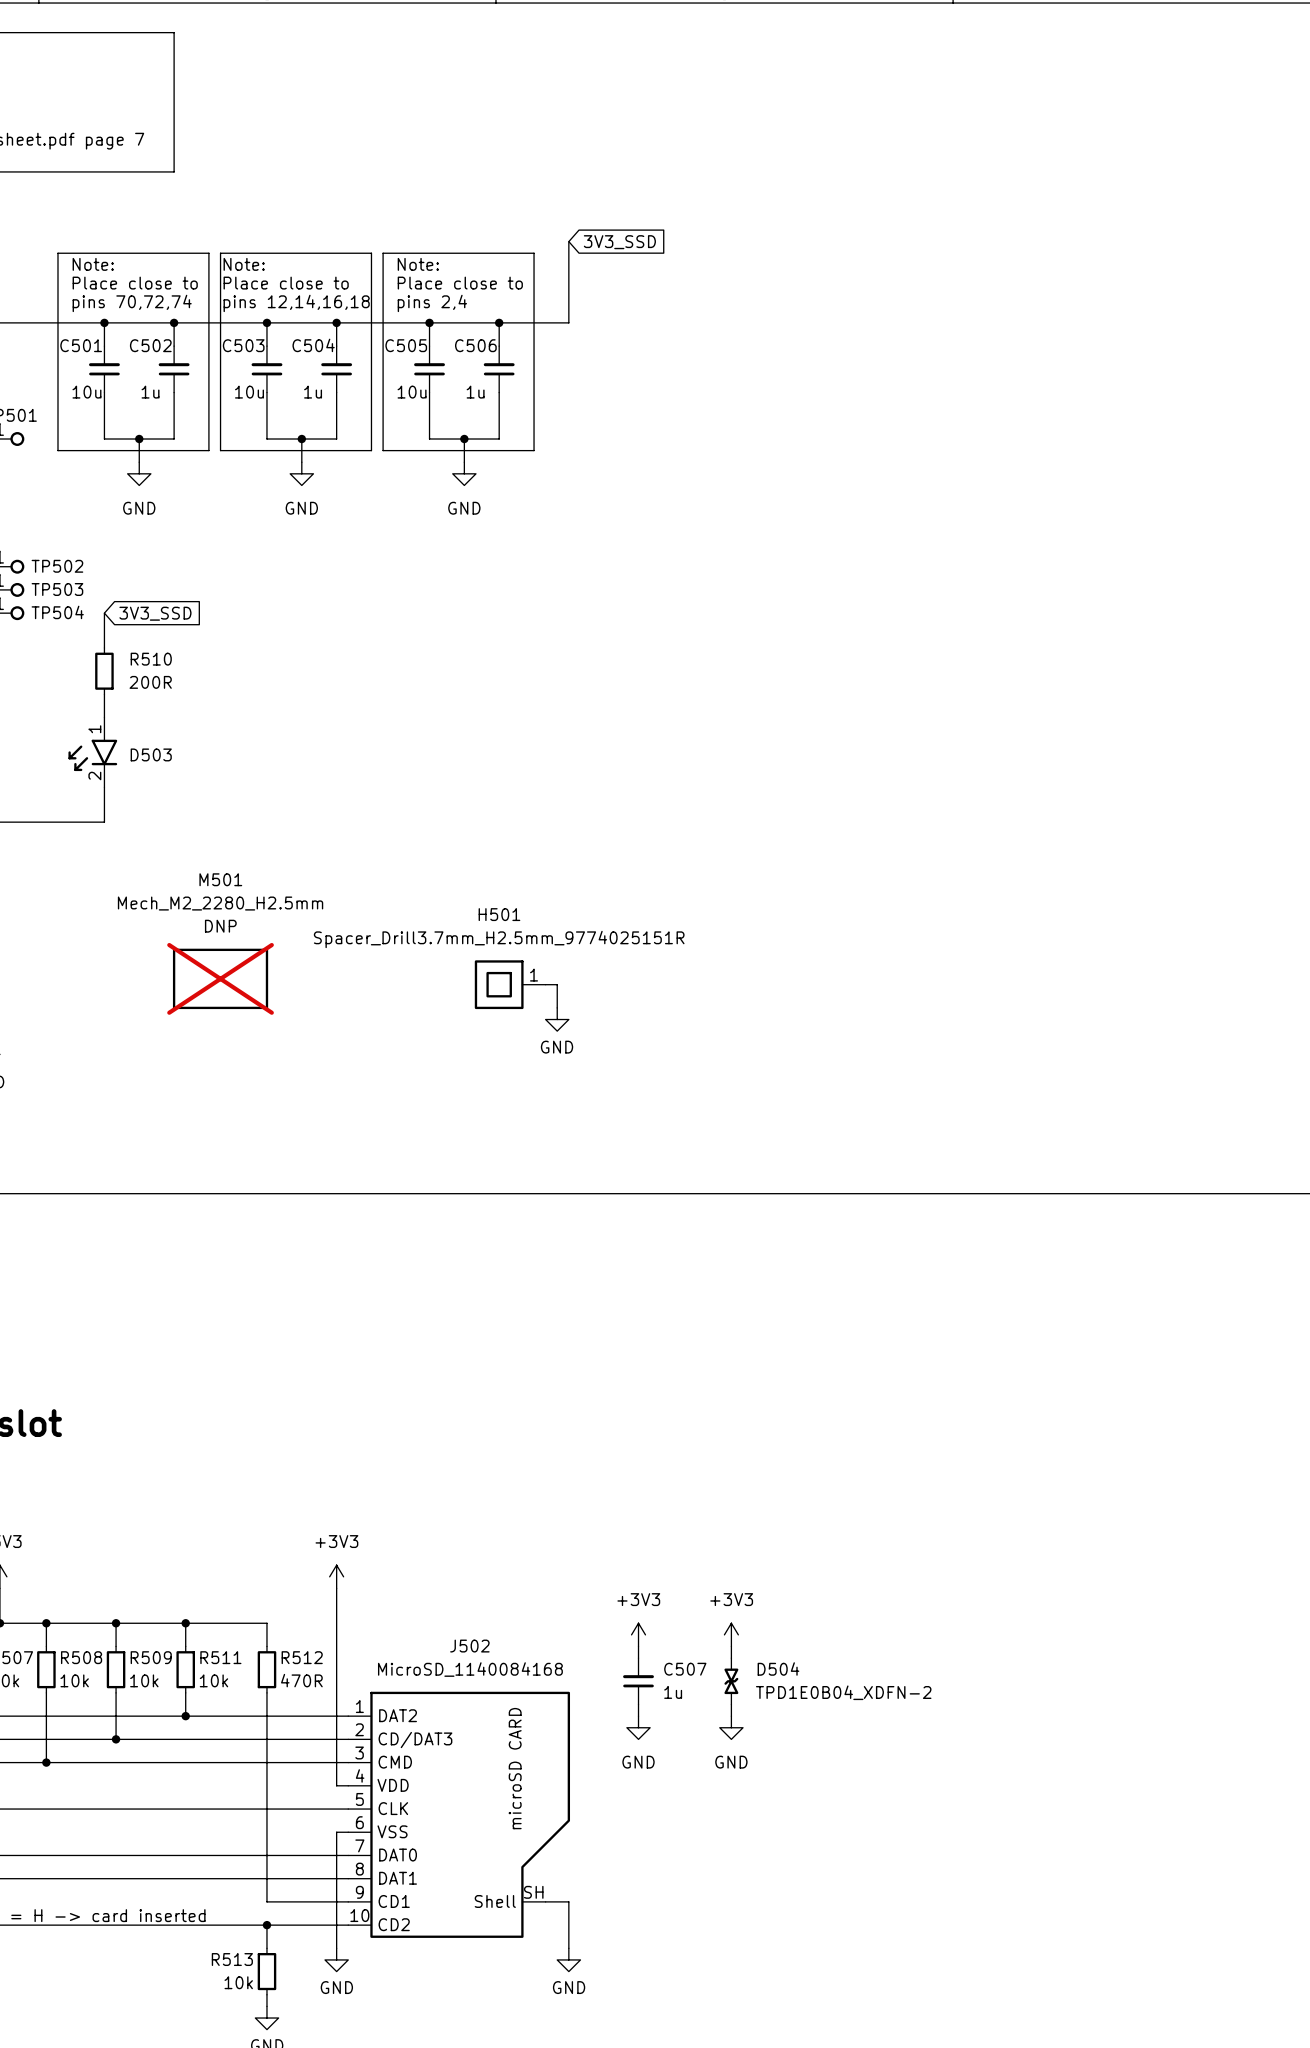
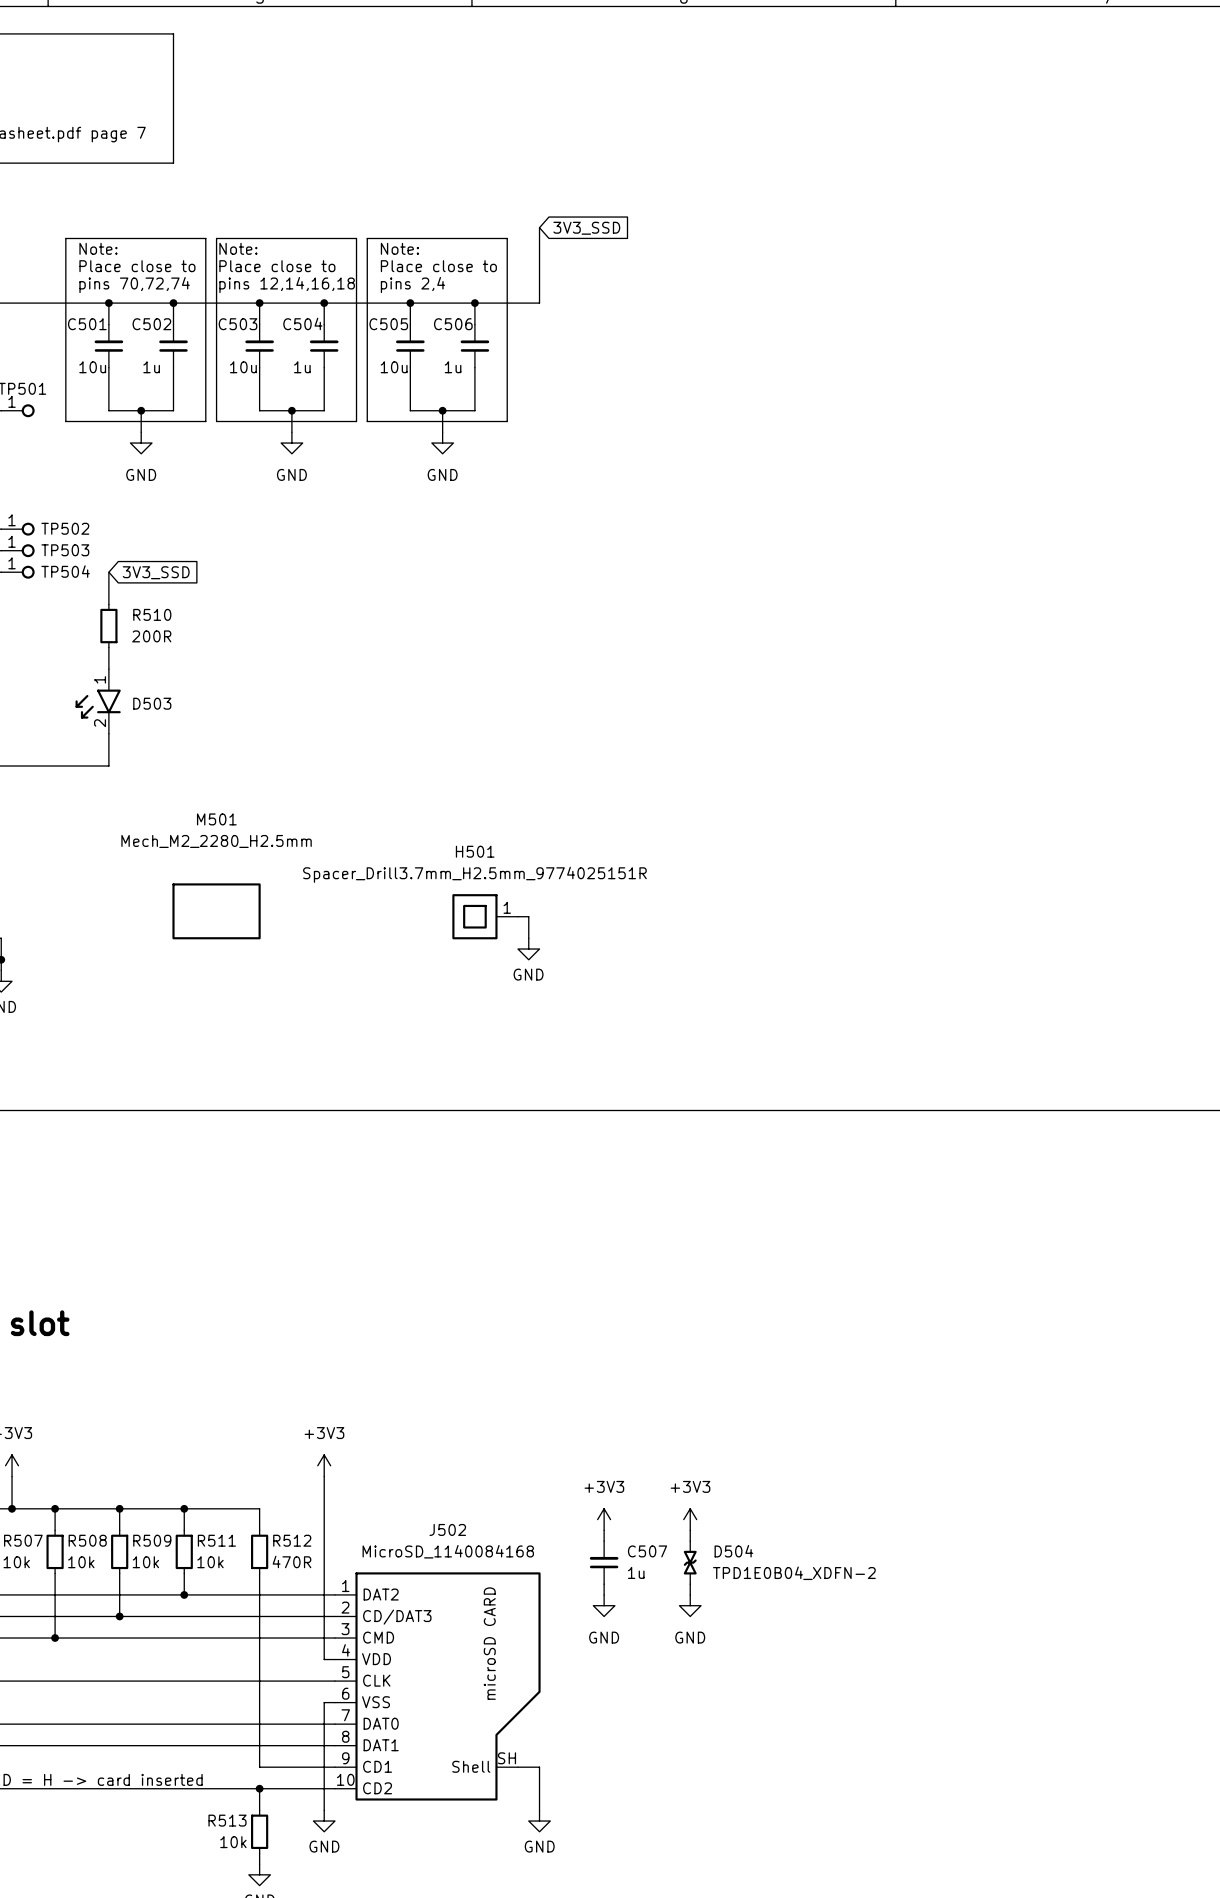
M501 text: DNP (220, 926) -> none
M501 do-not-place cross: (220, 978) -> none

